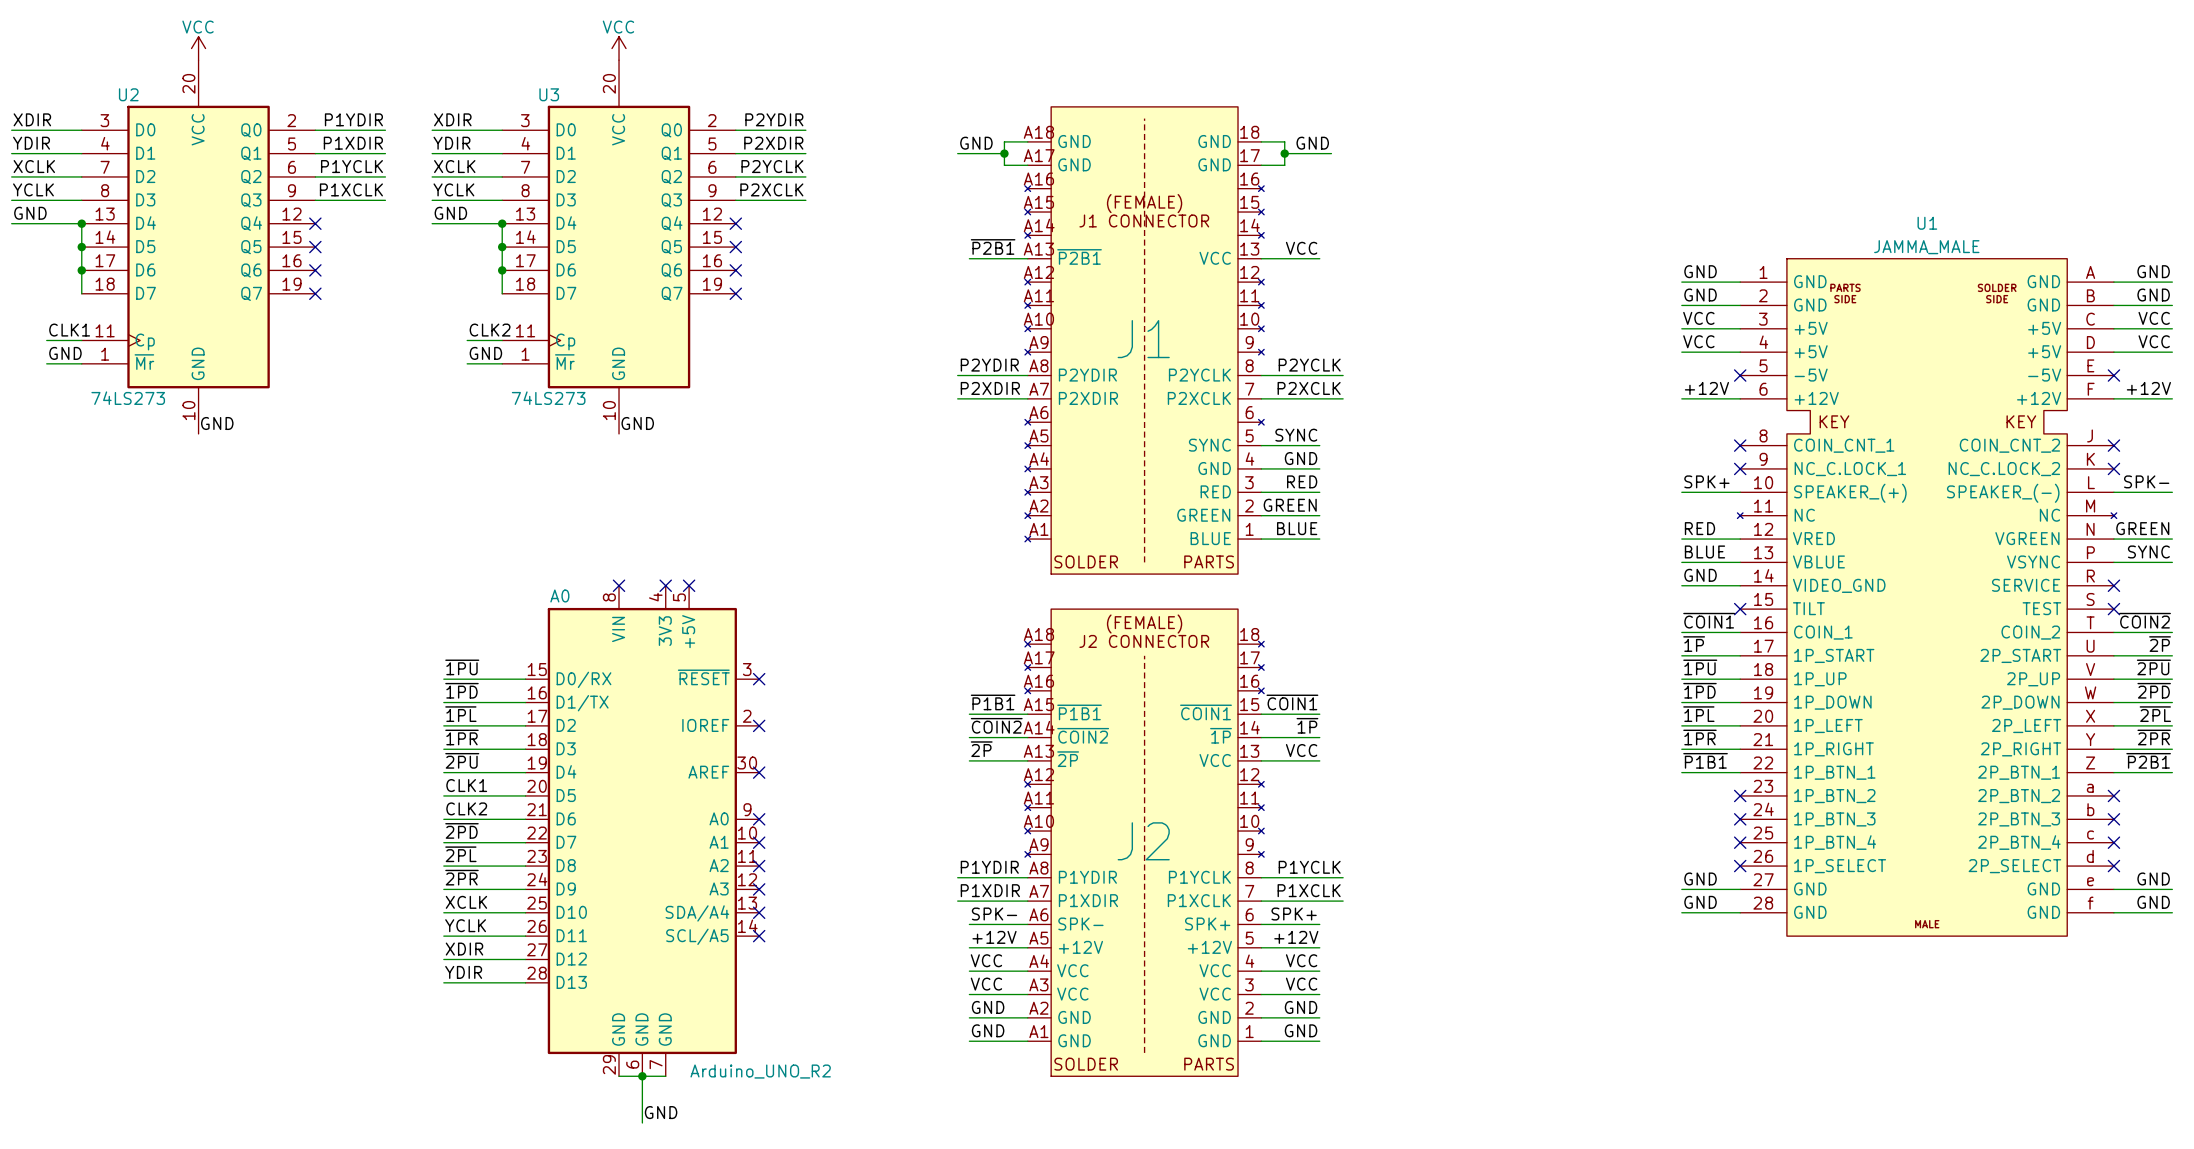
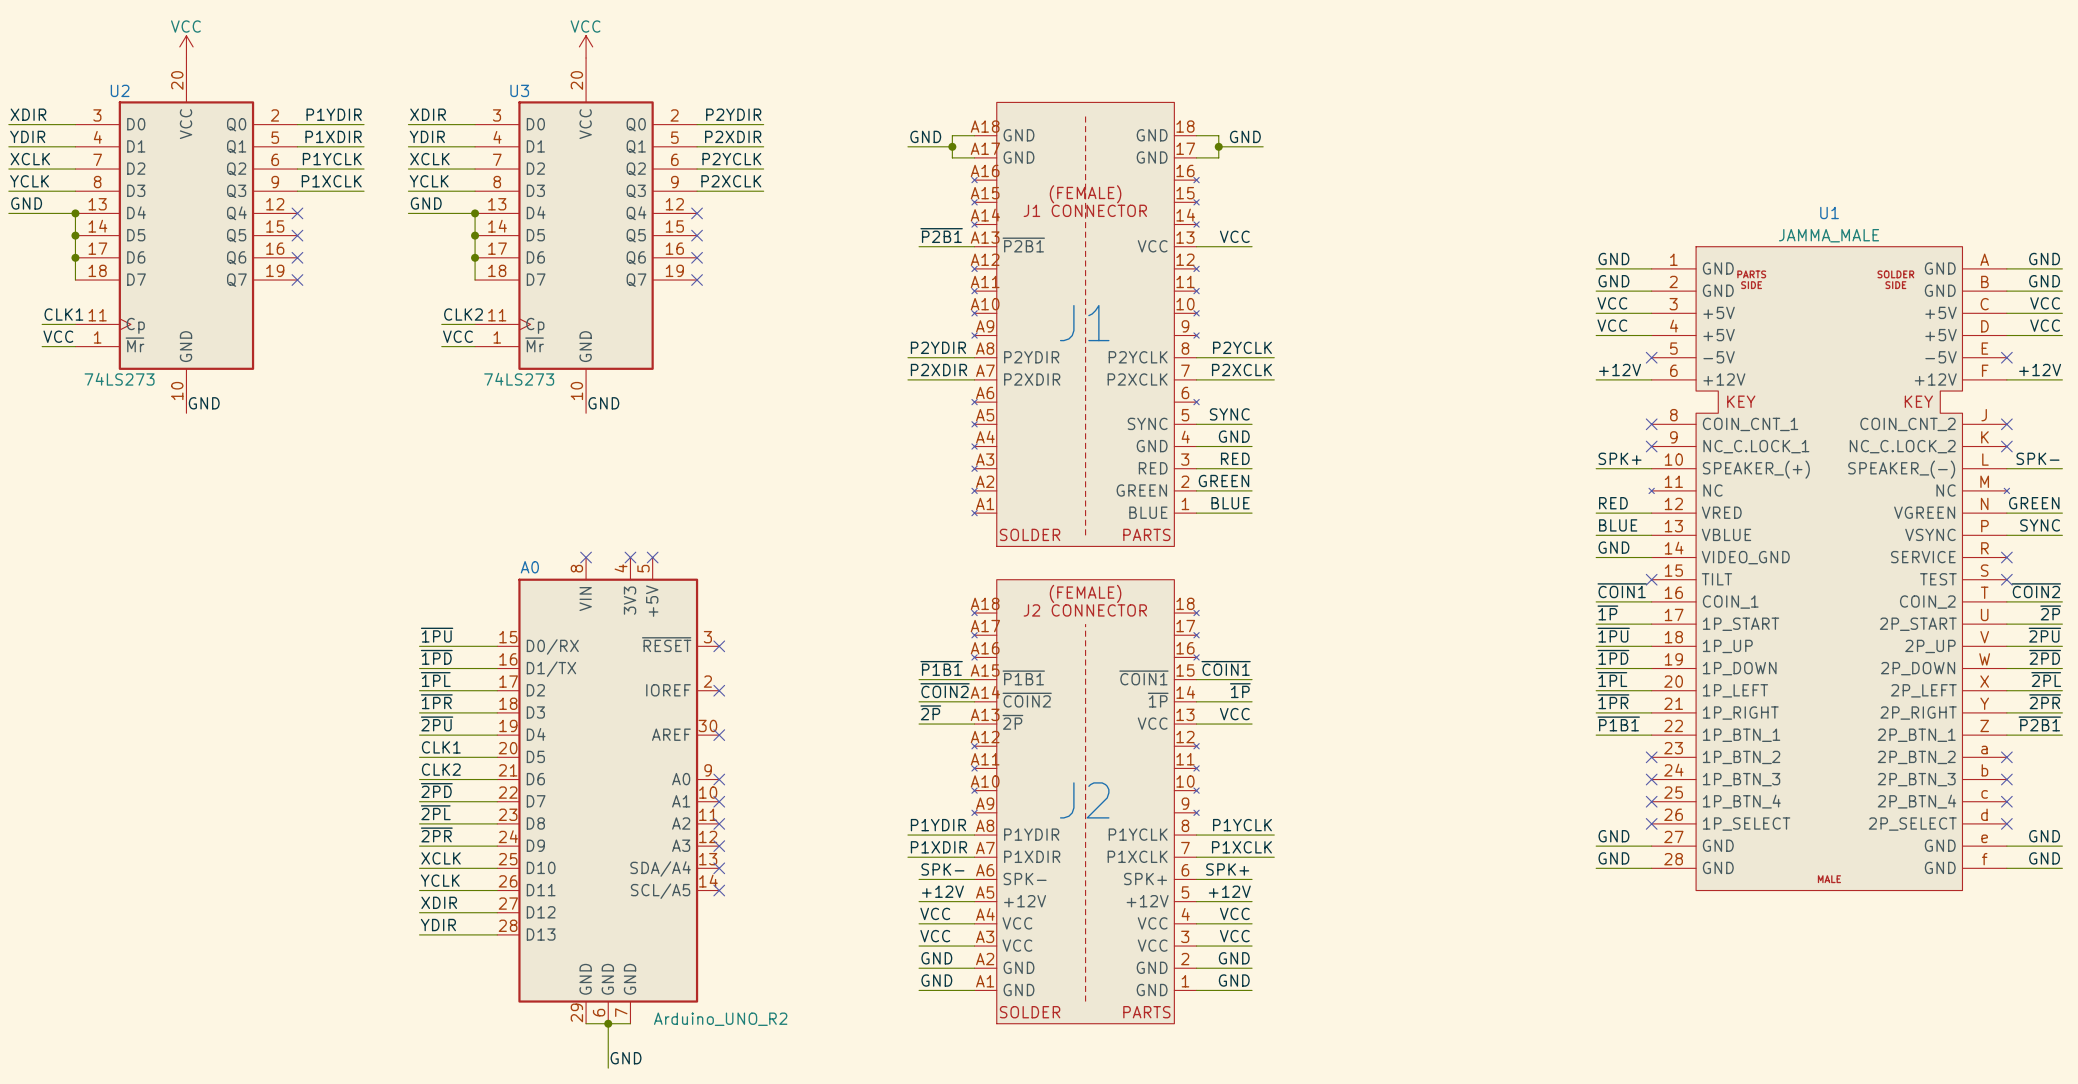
label: GND (65, 353) -> VCC (58, 336)
label: GND (485, 353) -> VCC (457, 336)

